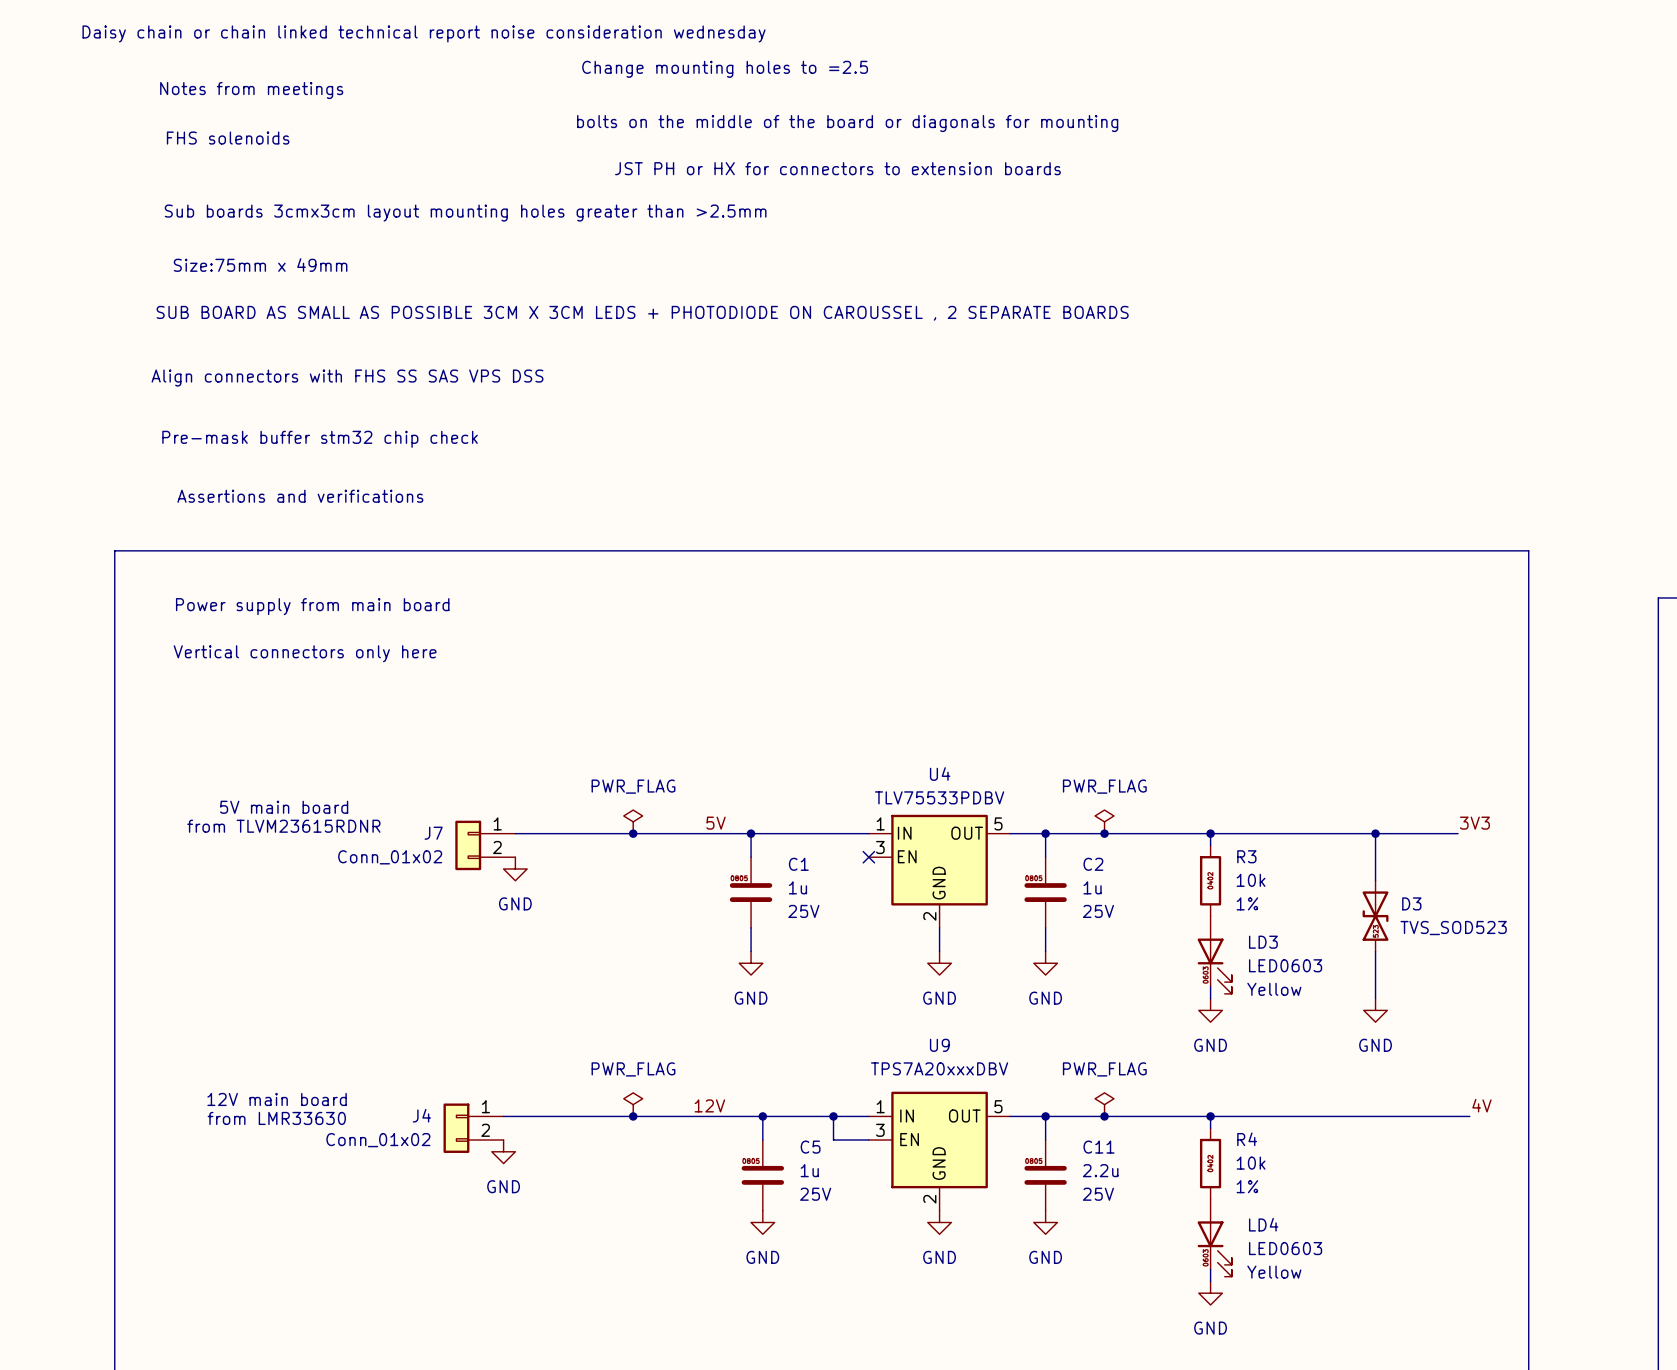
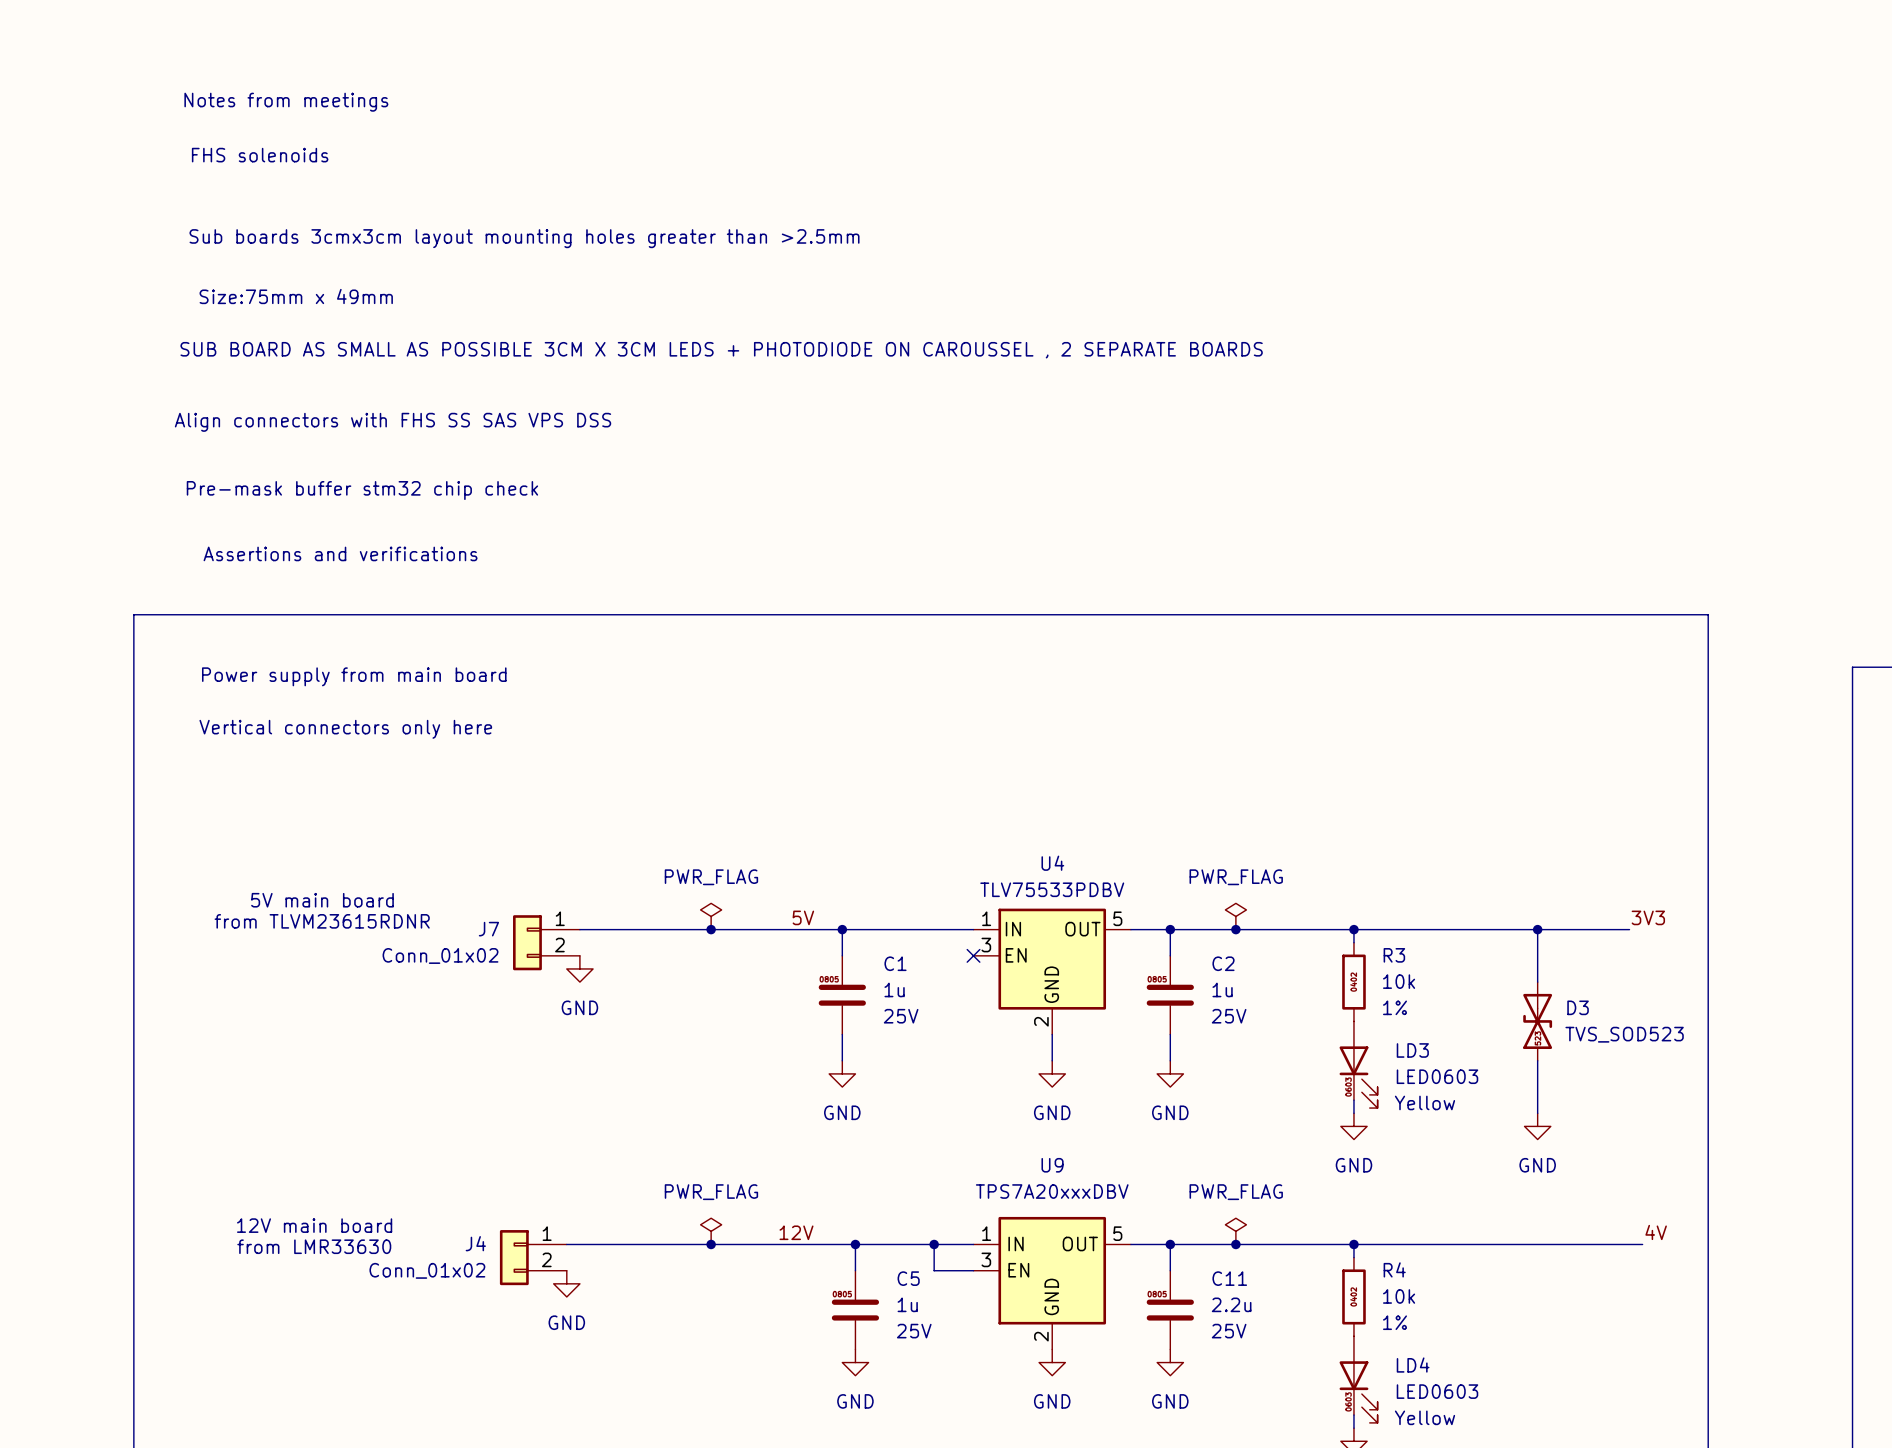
text: Daisy chain or chain linked technical report noise consideration wednesday (424, 33) -> none
text: Change mounting holes to =2.5 (725, 69) -> none
text: bolts on the middle of the board or diagonals for mounting (847, 123) -> none
text: JST PH or HX for connectors to extension boards (837, 168) -> none

